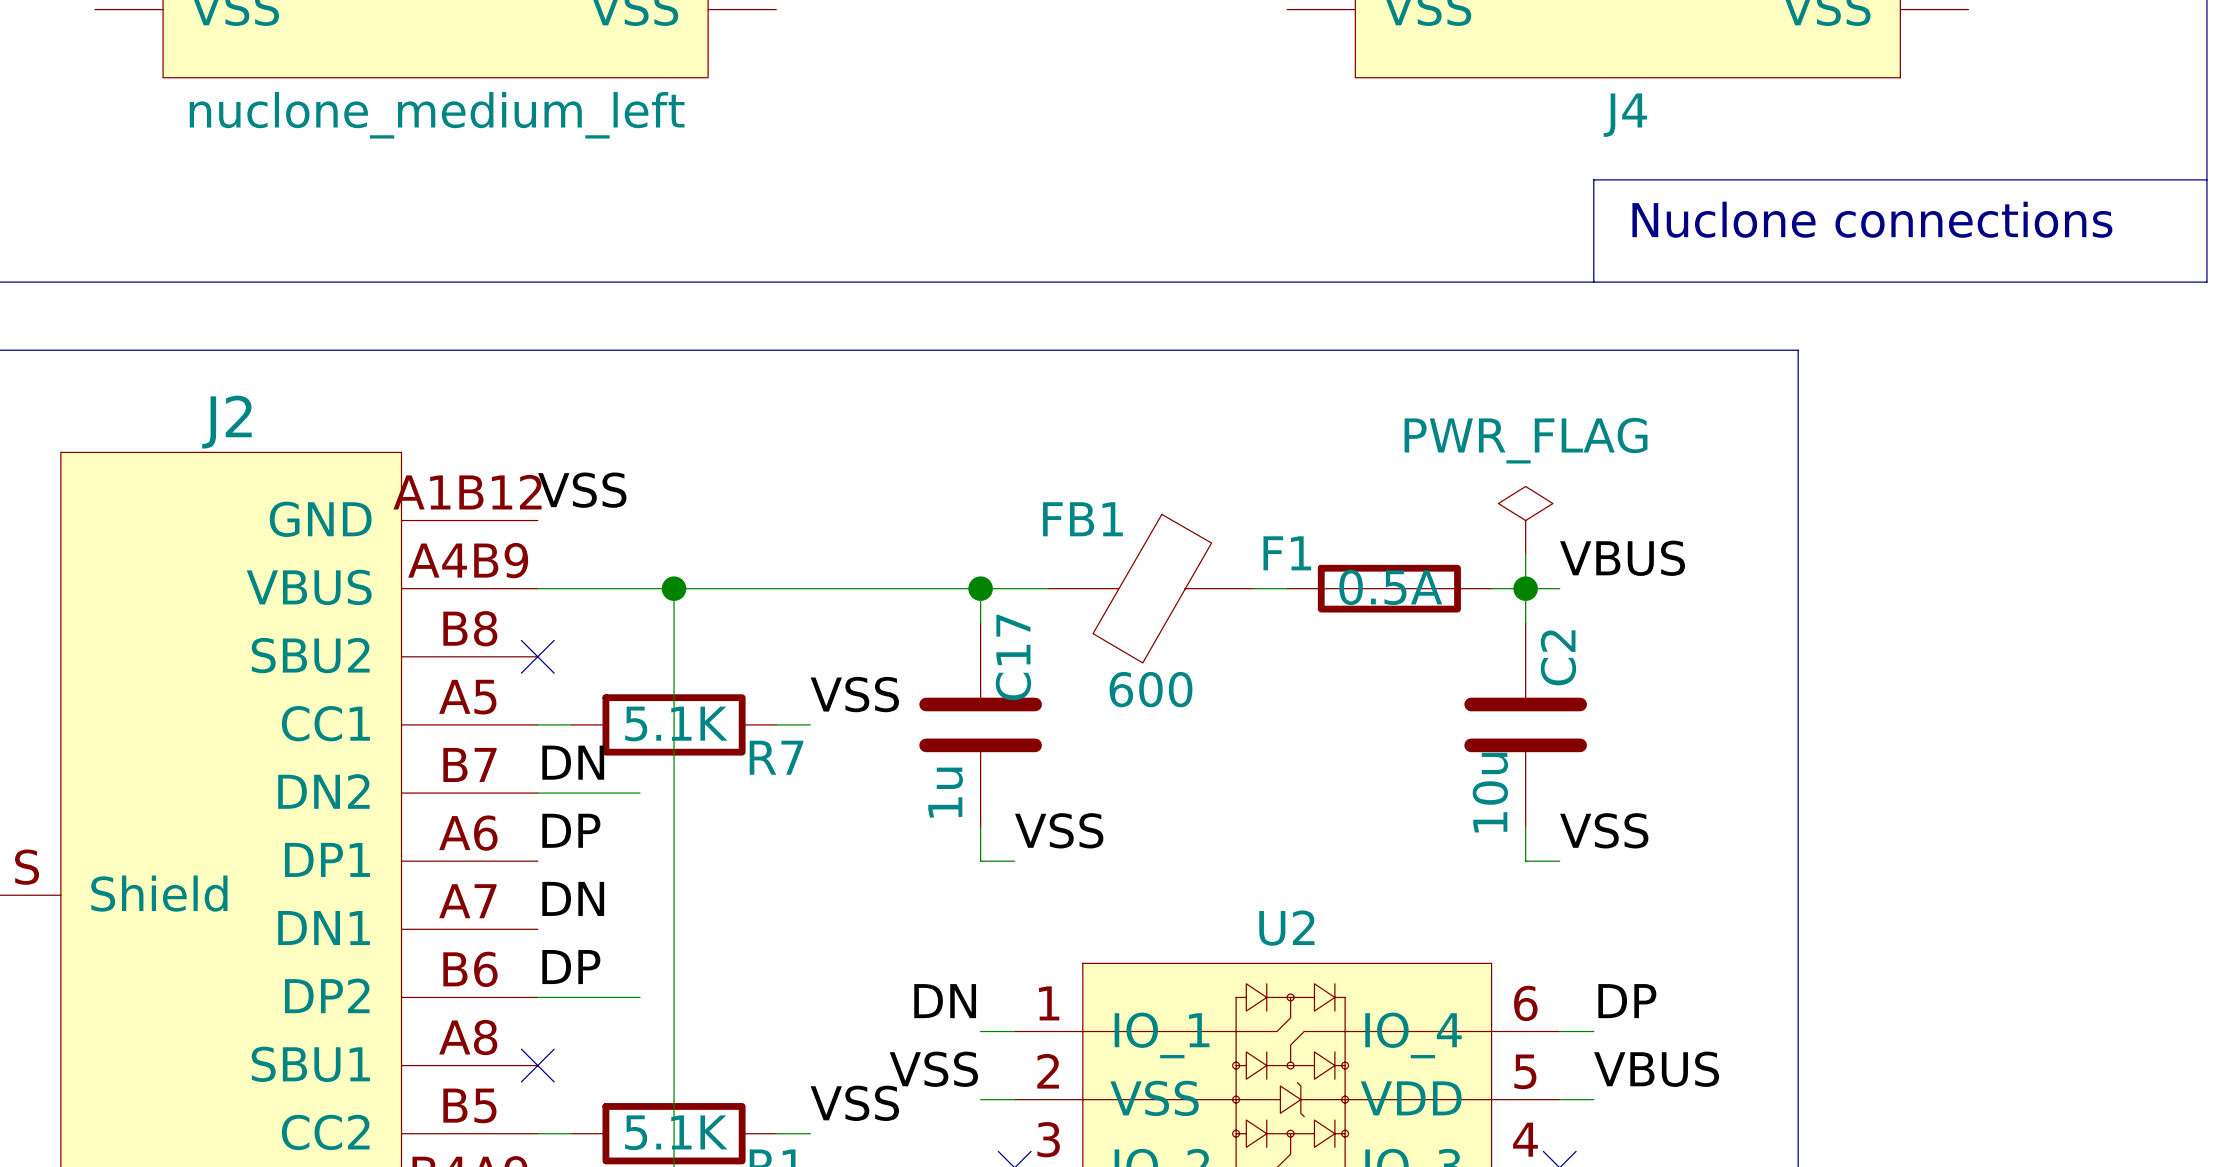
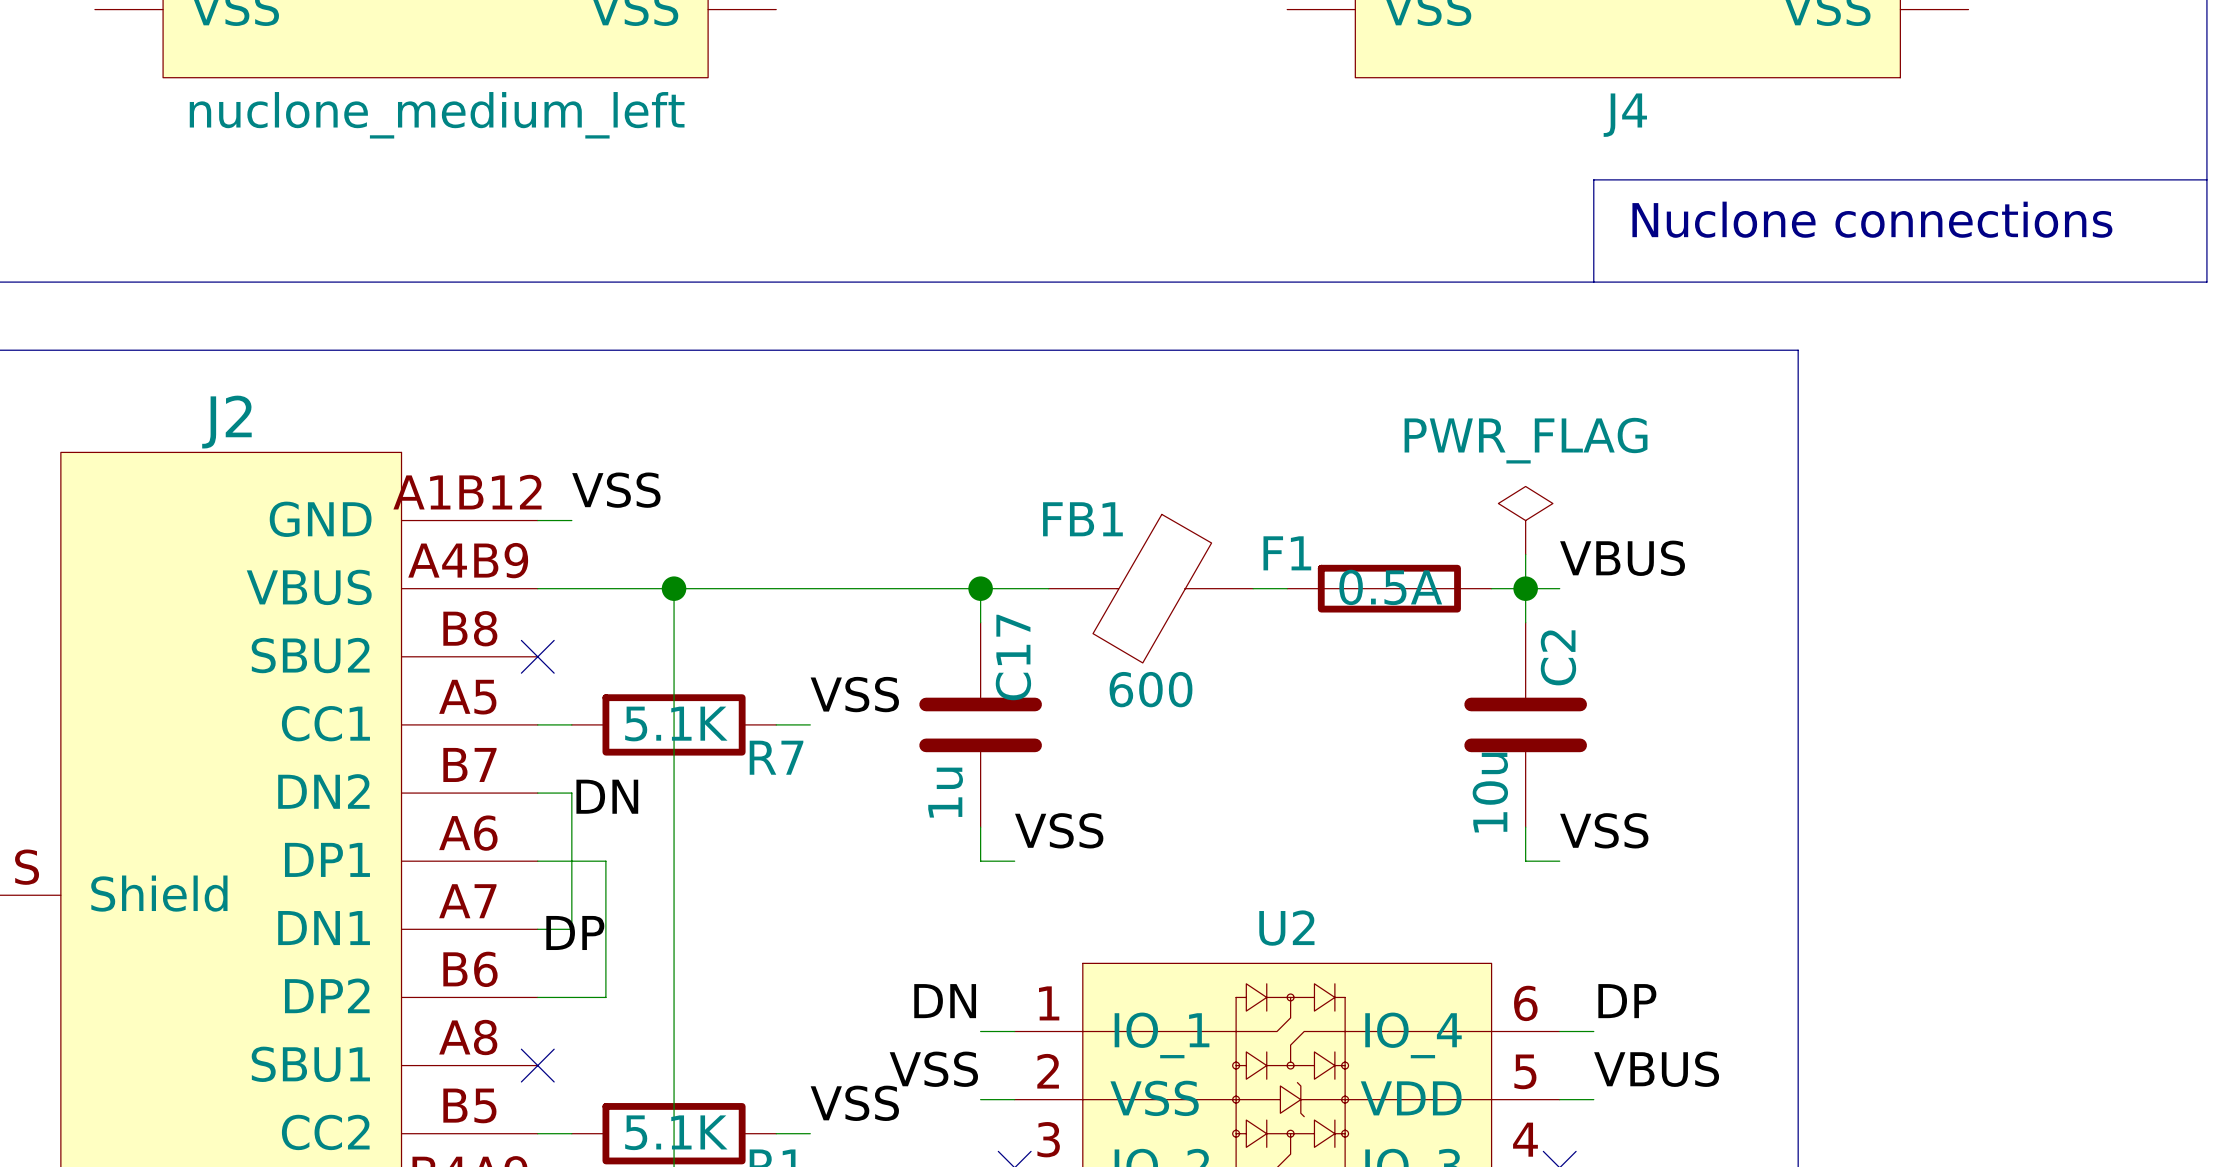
label position: VSS (582, 490) -> VSS (616, 490)
wire: none -> (537, 520) (571, 520)
label position: DN (573, 762) -> DN (607, 796)
wire: (571, 793) (639, 793) -> (571, 793) (571, 929) (537, 929)
label: DP (571, 830) -> none
label: DN (573, 898) -> none
label position: DP (571, 967) -> DP (575, 932)
wire: (605, 997) (639, 997) -> (605, 997) (605, 861) (537, 861)

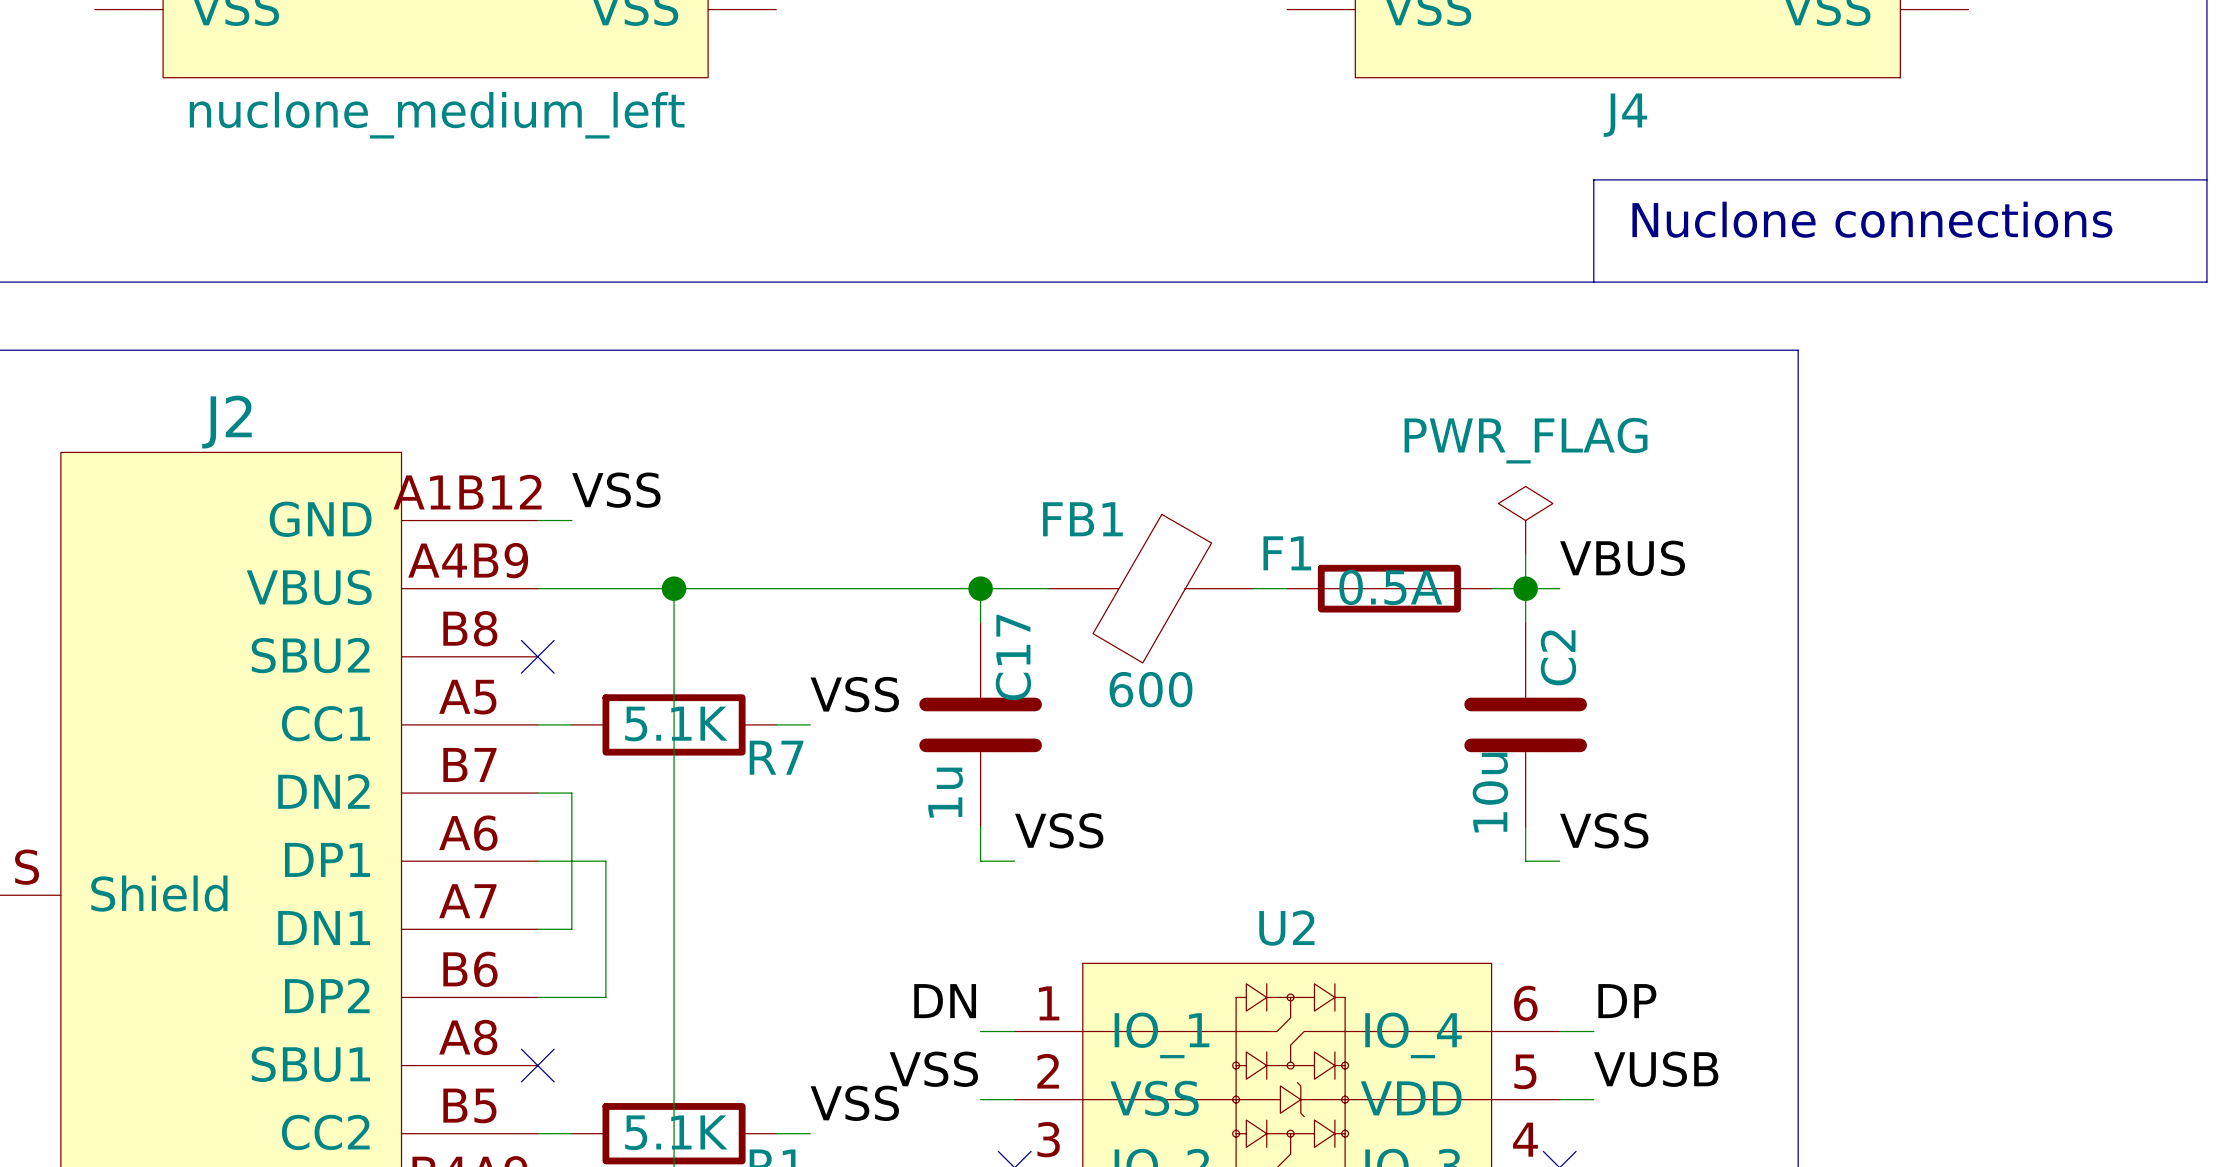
label: DN (607, 796) -> none
label: DP (575, 932) -> none
label: VBUS (1656, 1069) -> VUSB (1656, 1069)

